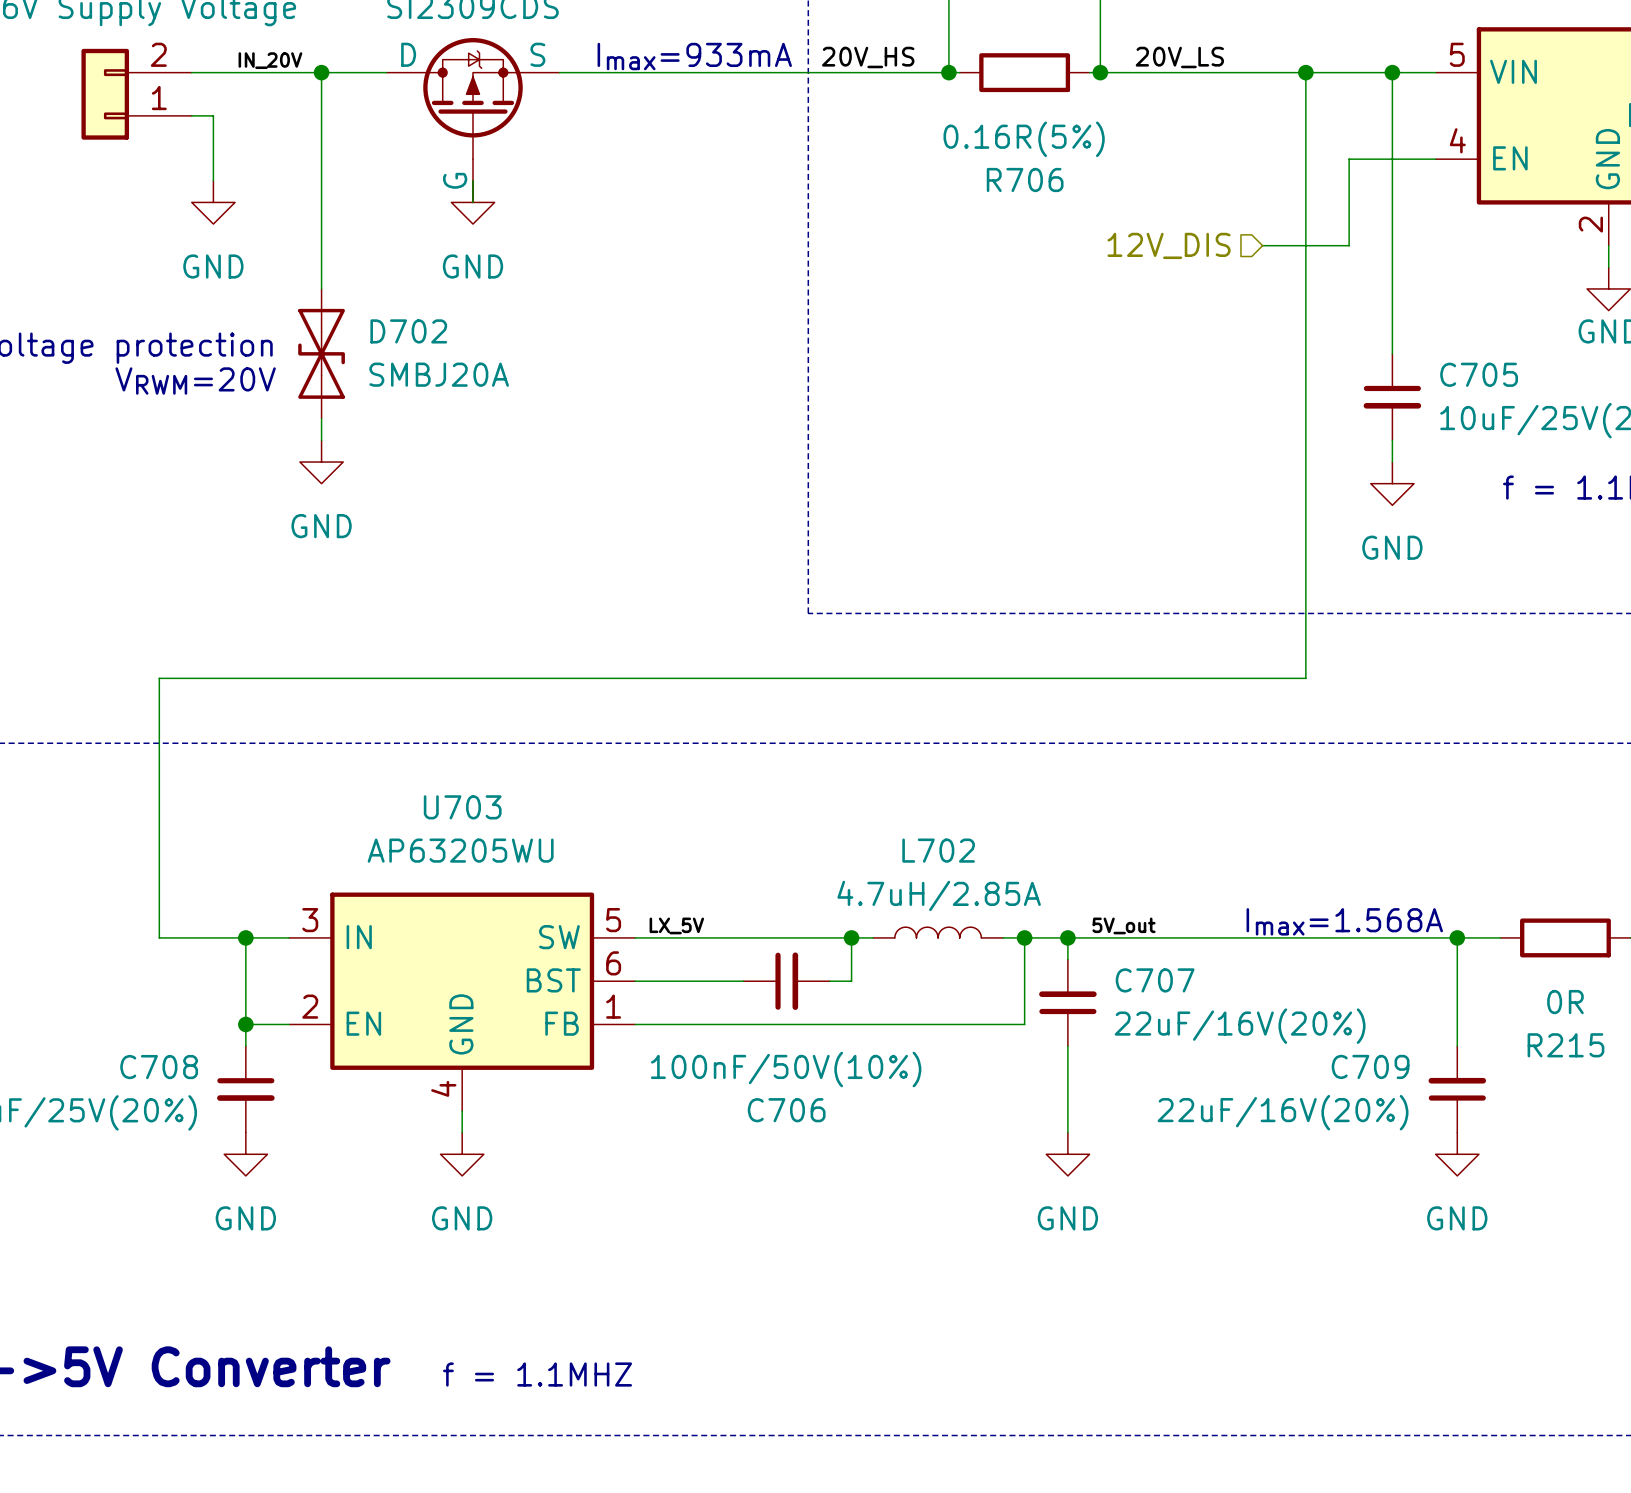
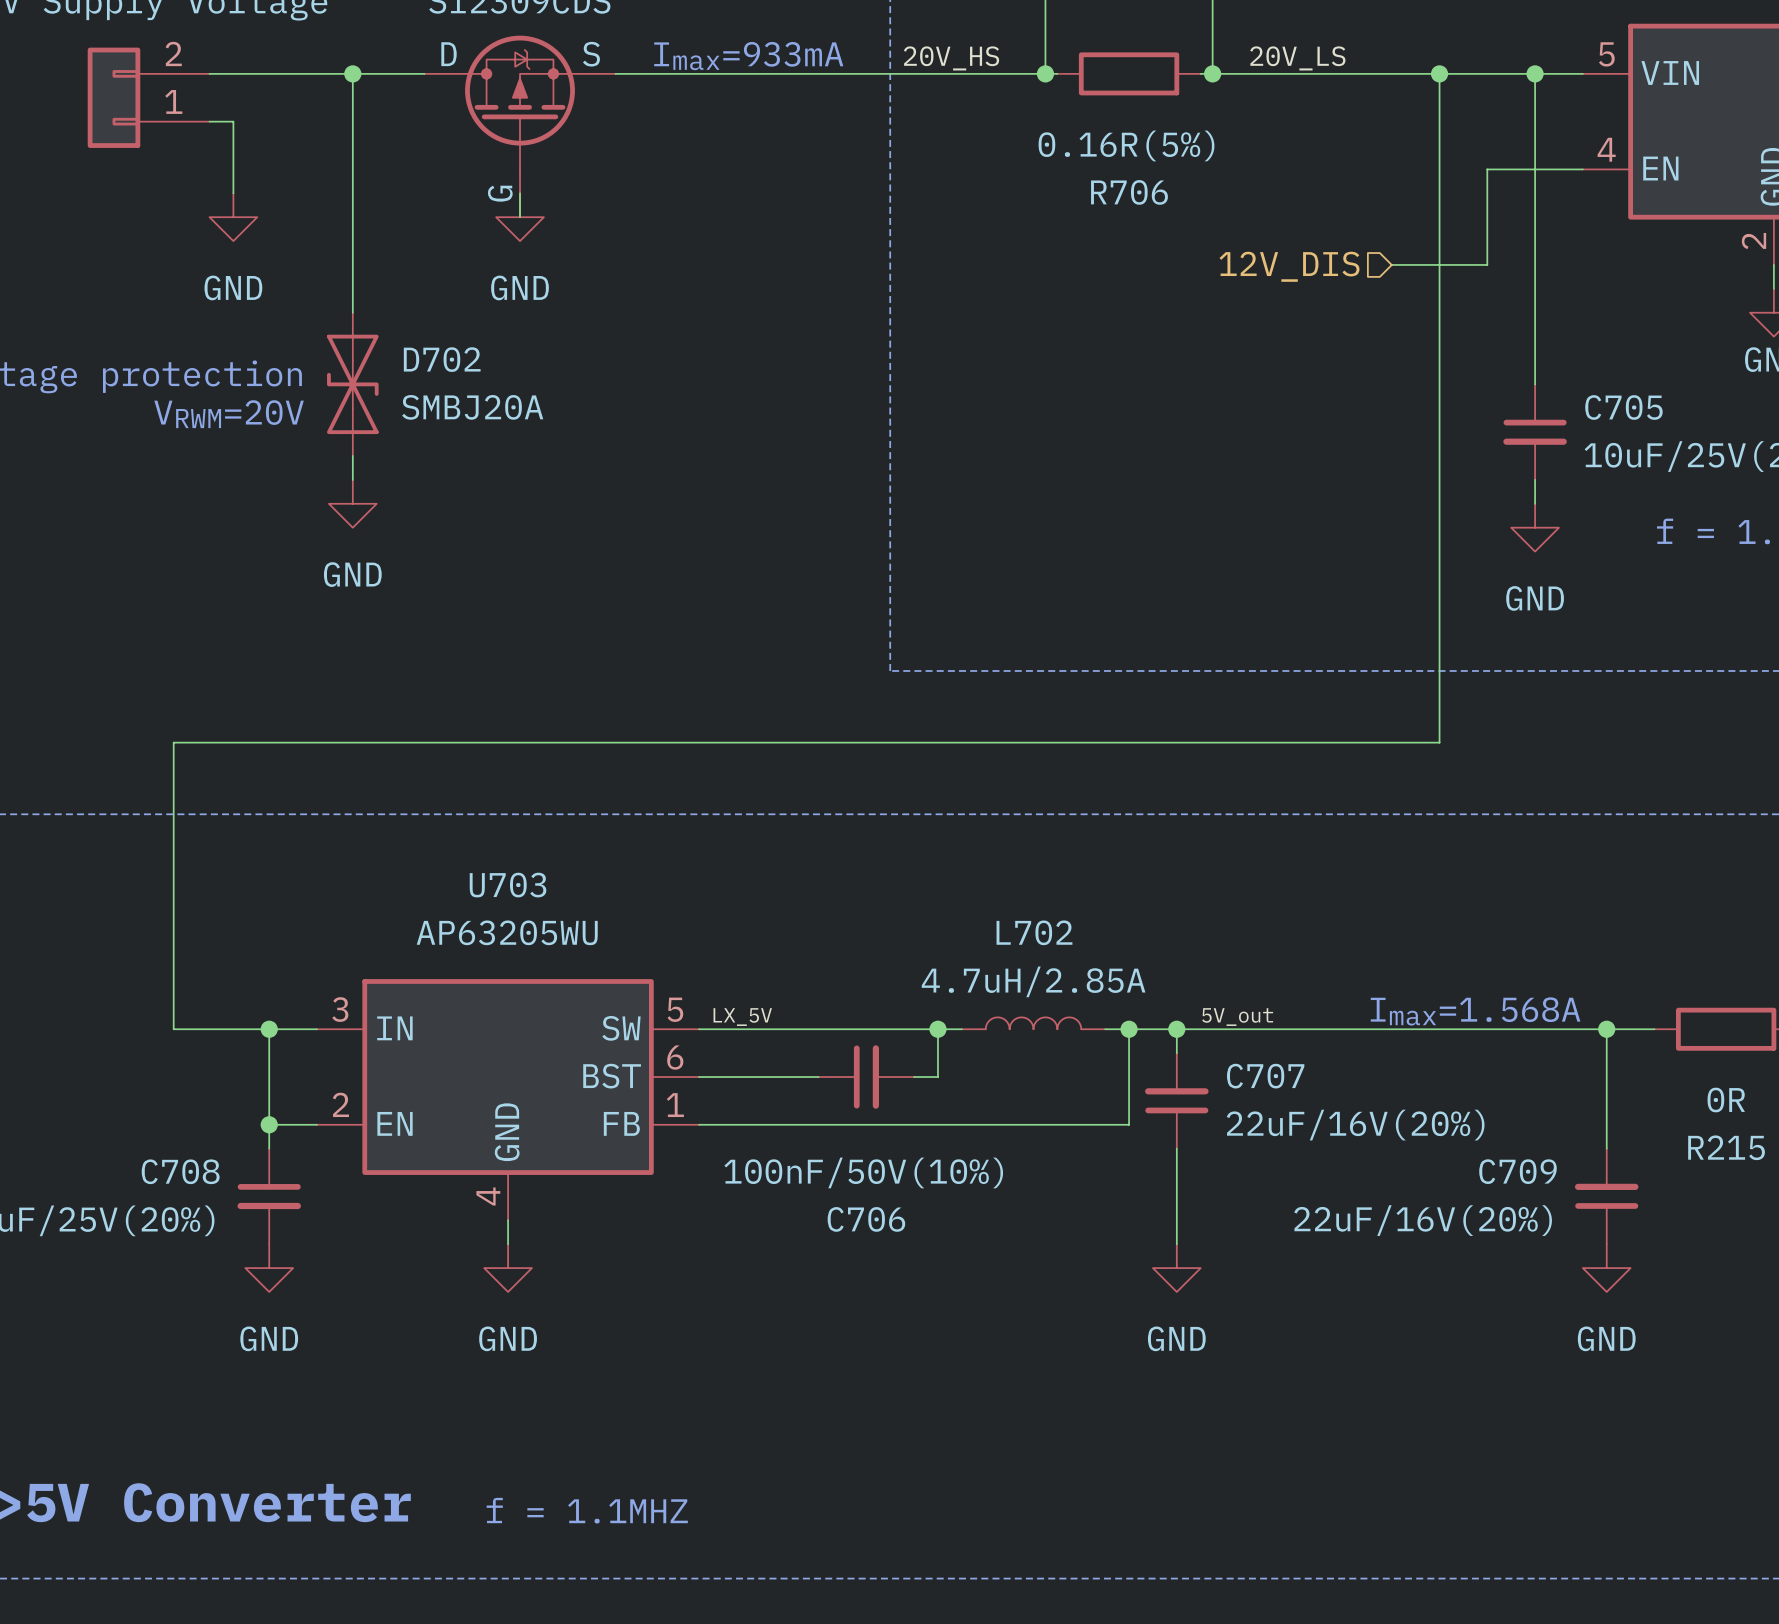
label: IN_20V (270, 60) -> none

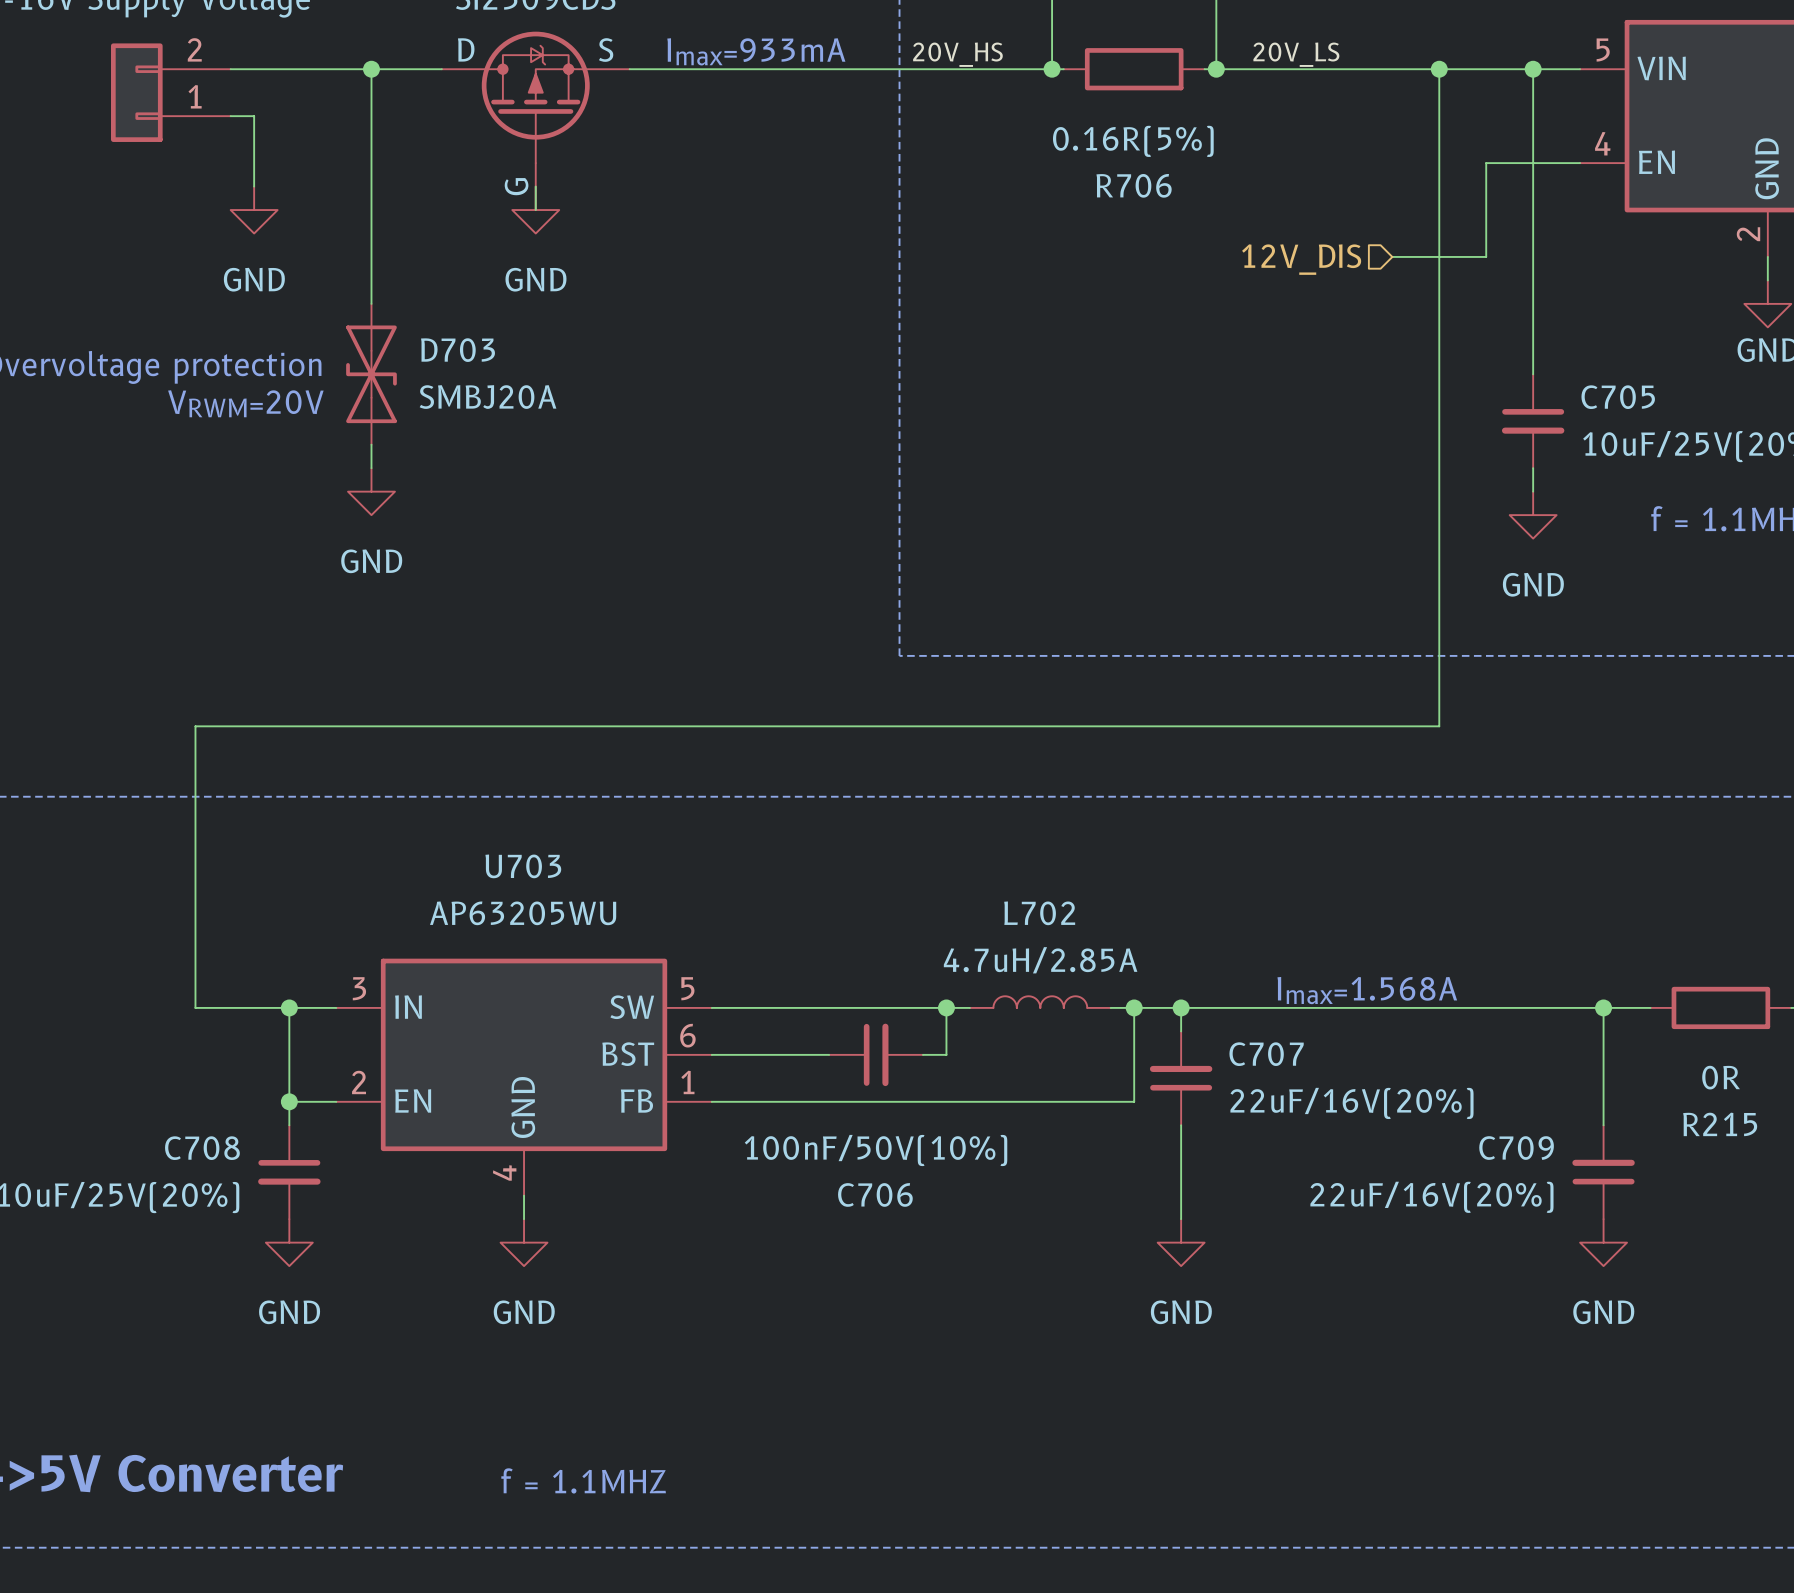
D702 name: D702 (442, 359) -> D703 (458, 350)
text position: Imax=1.568A (1475, 1011) -> Imax=1.568A (1367, 990)
label: LX_5V (742, 1017) -> none
label: 5V_out (1237, 1017) -> none

